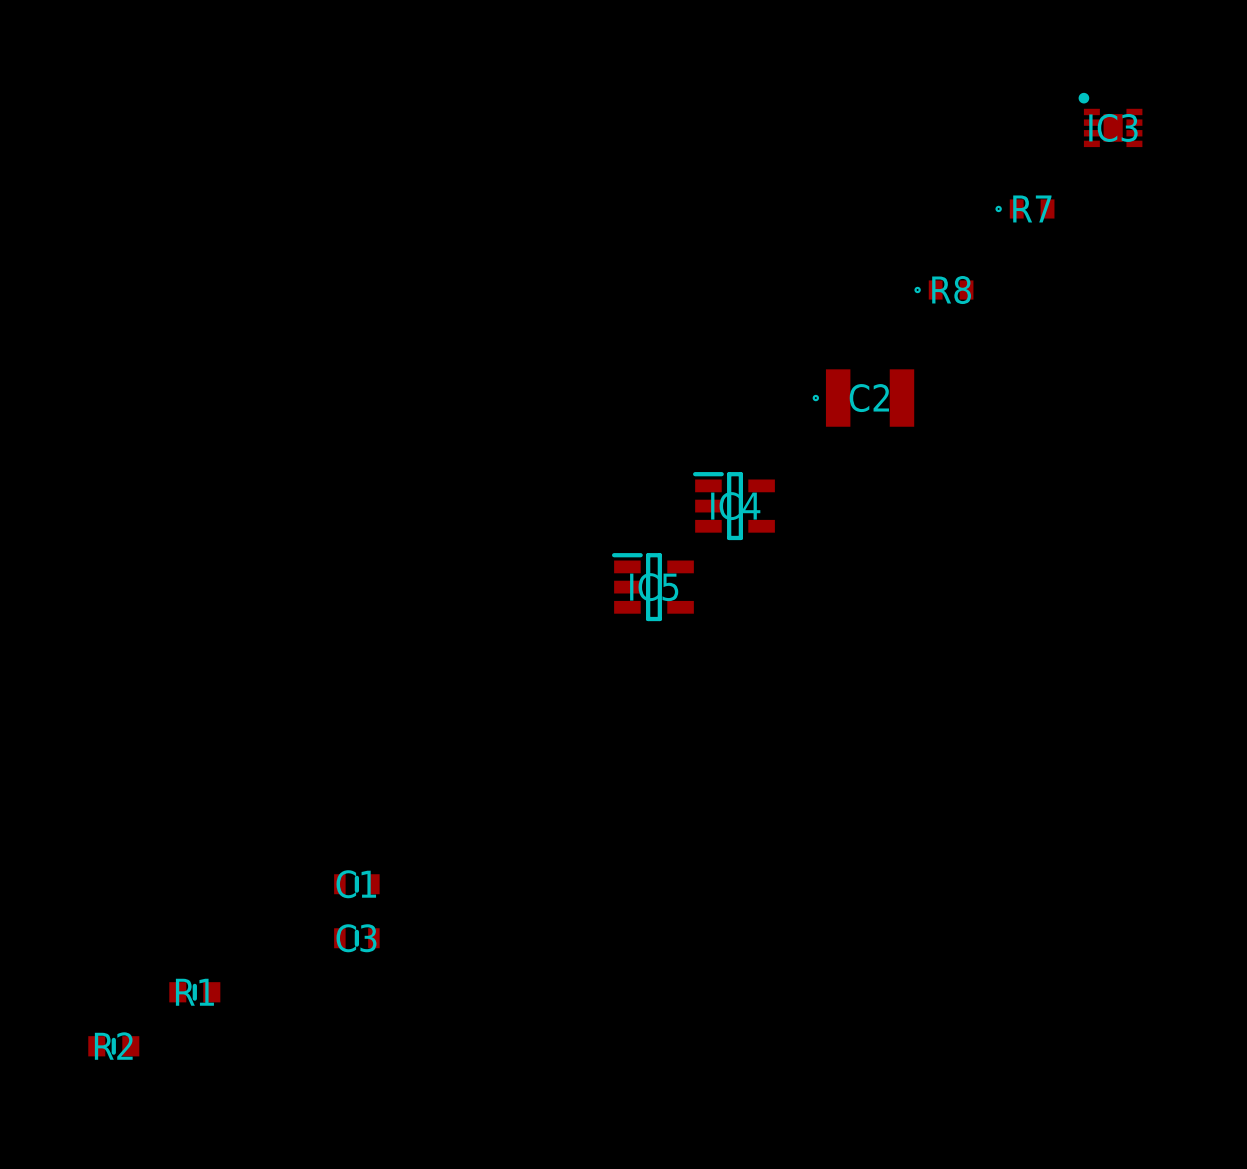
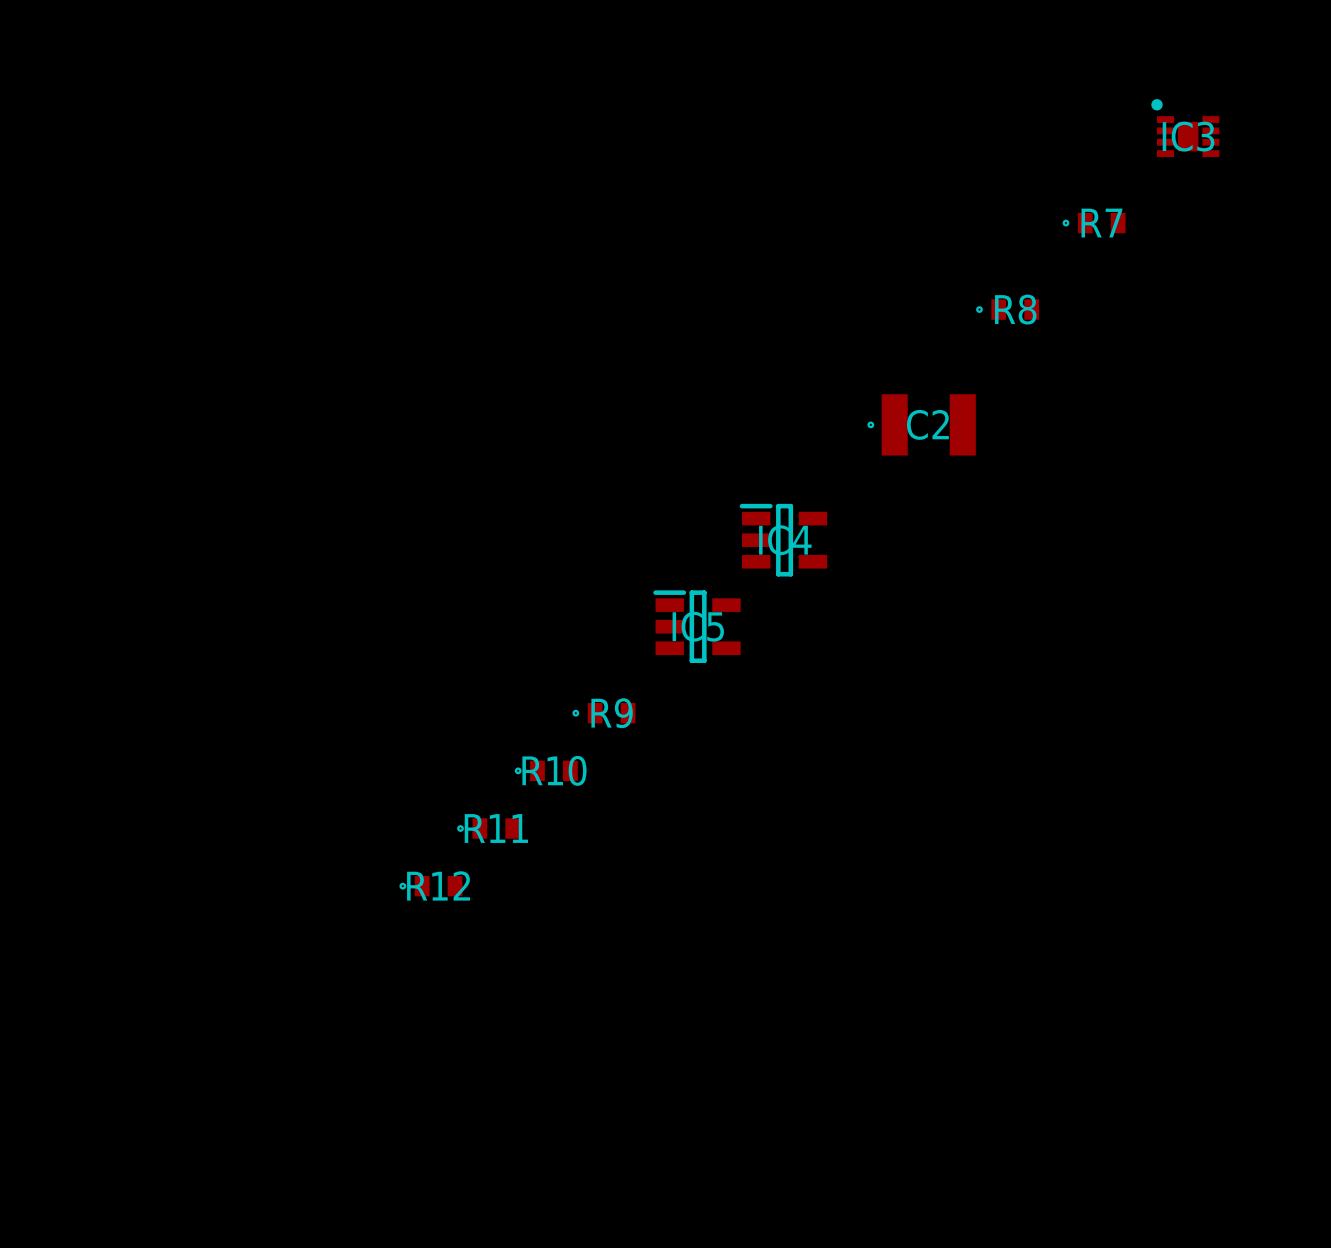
R9: none -> (603, 713)
R10: none -> (546, 770)
R11: none -> (488, 828)
R12: none -> (430, 886)
C1: (356, 884) -> none
C3: (356, 938) -> none
R1: (194, 992) -> none
R2: (113, 1046) -> none

